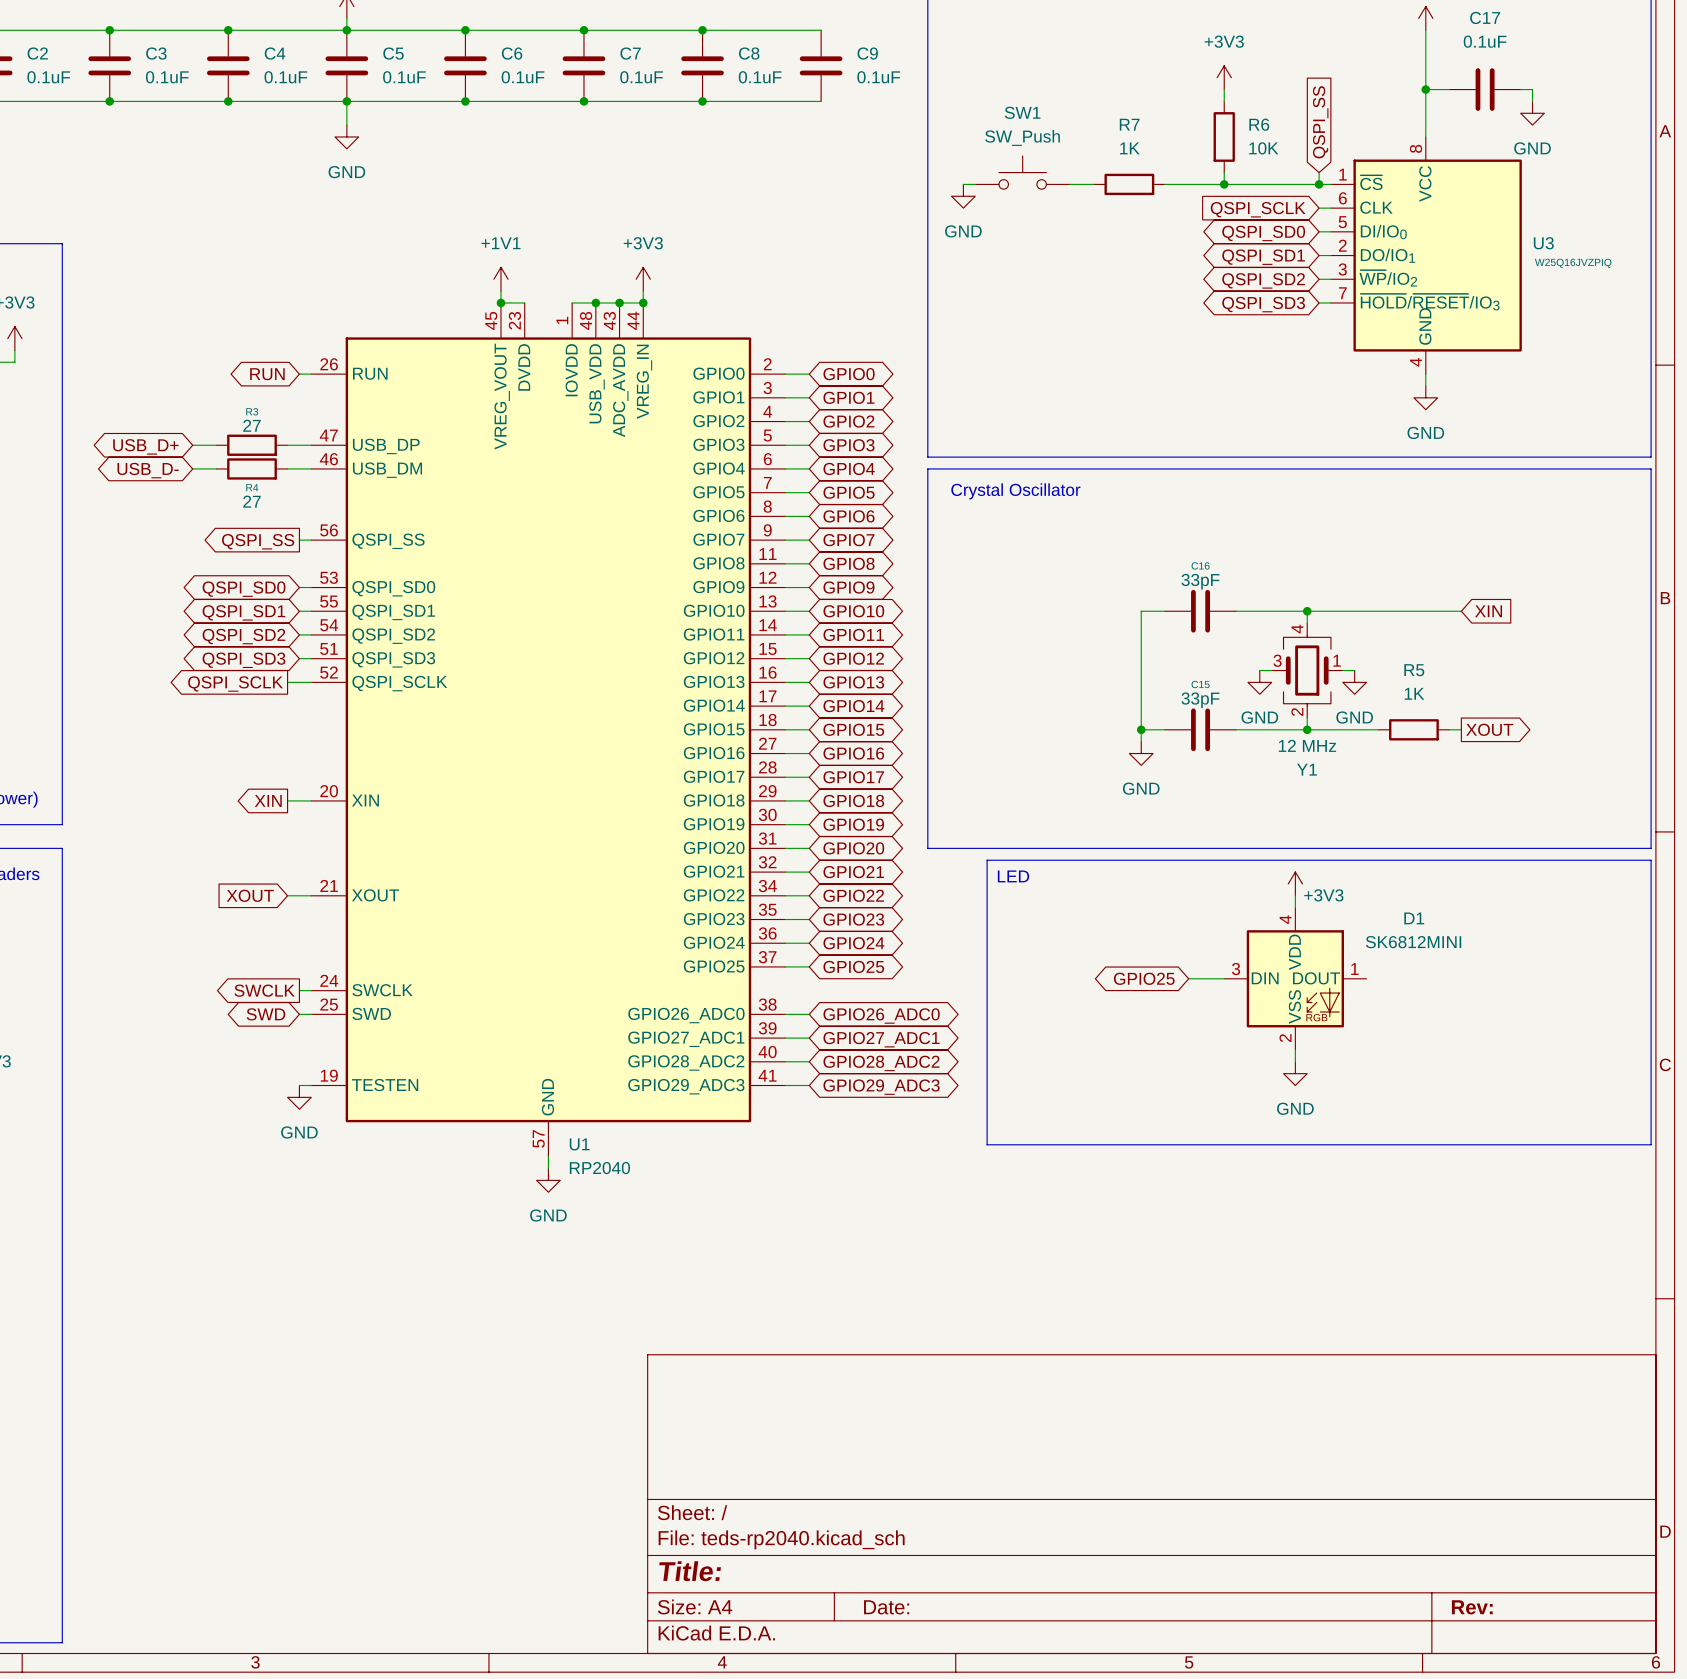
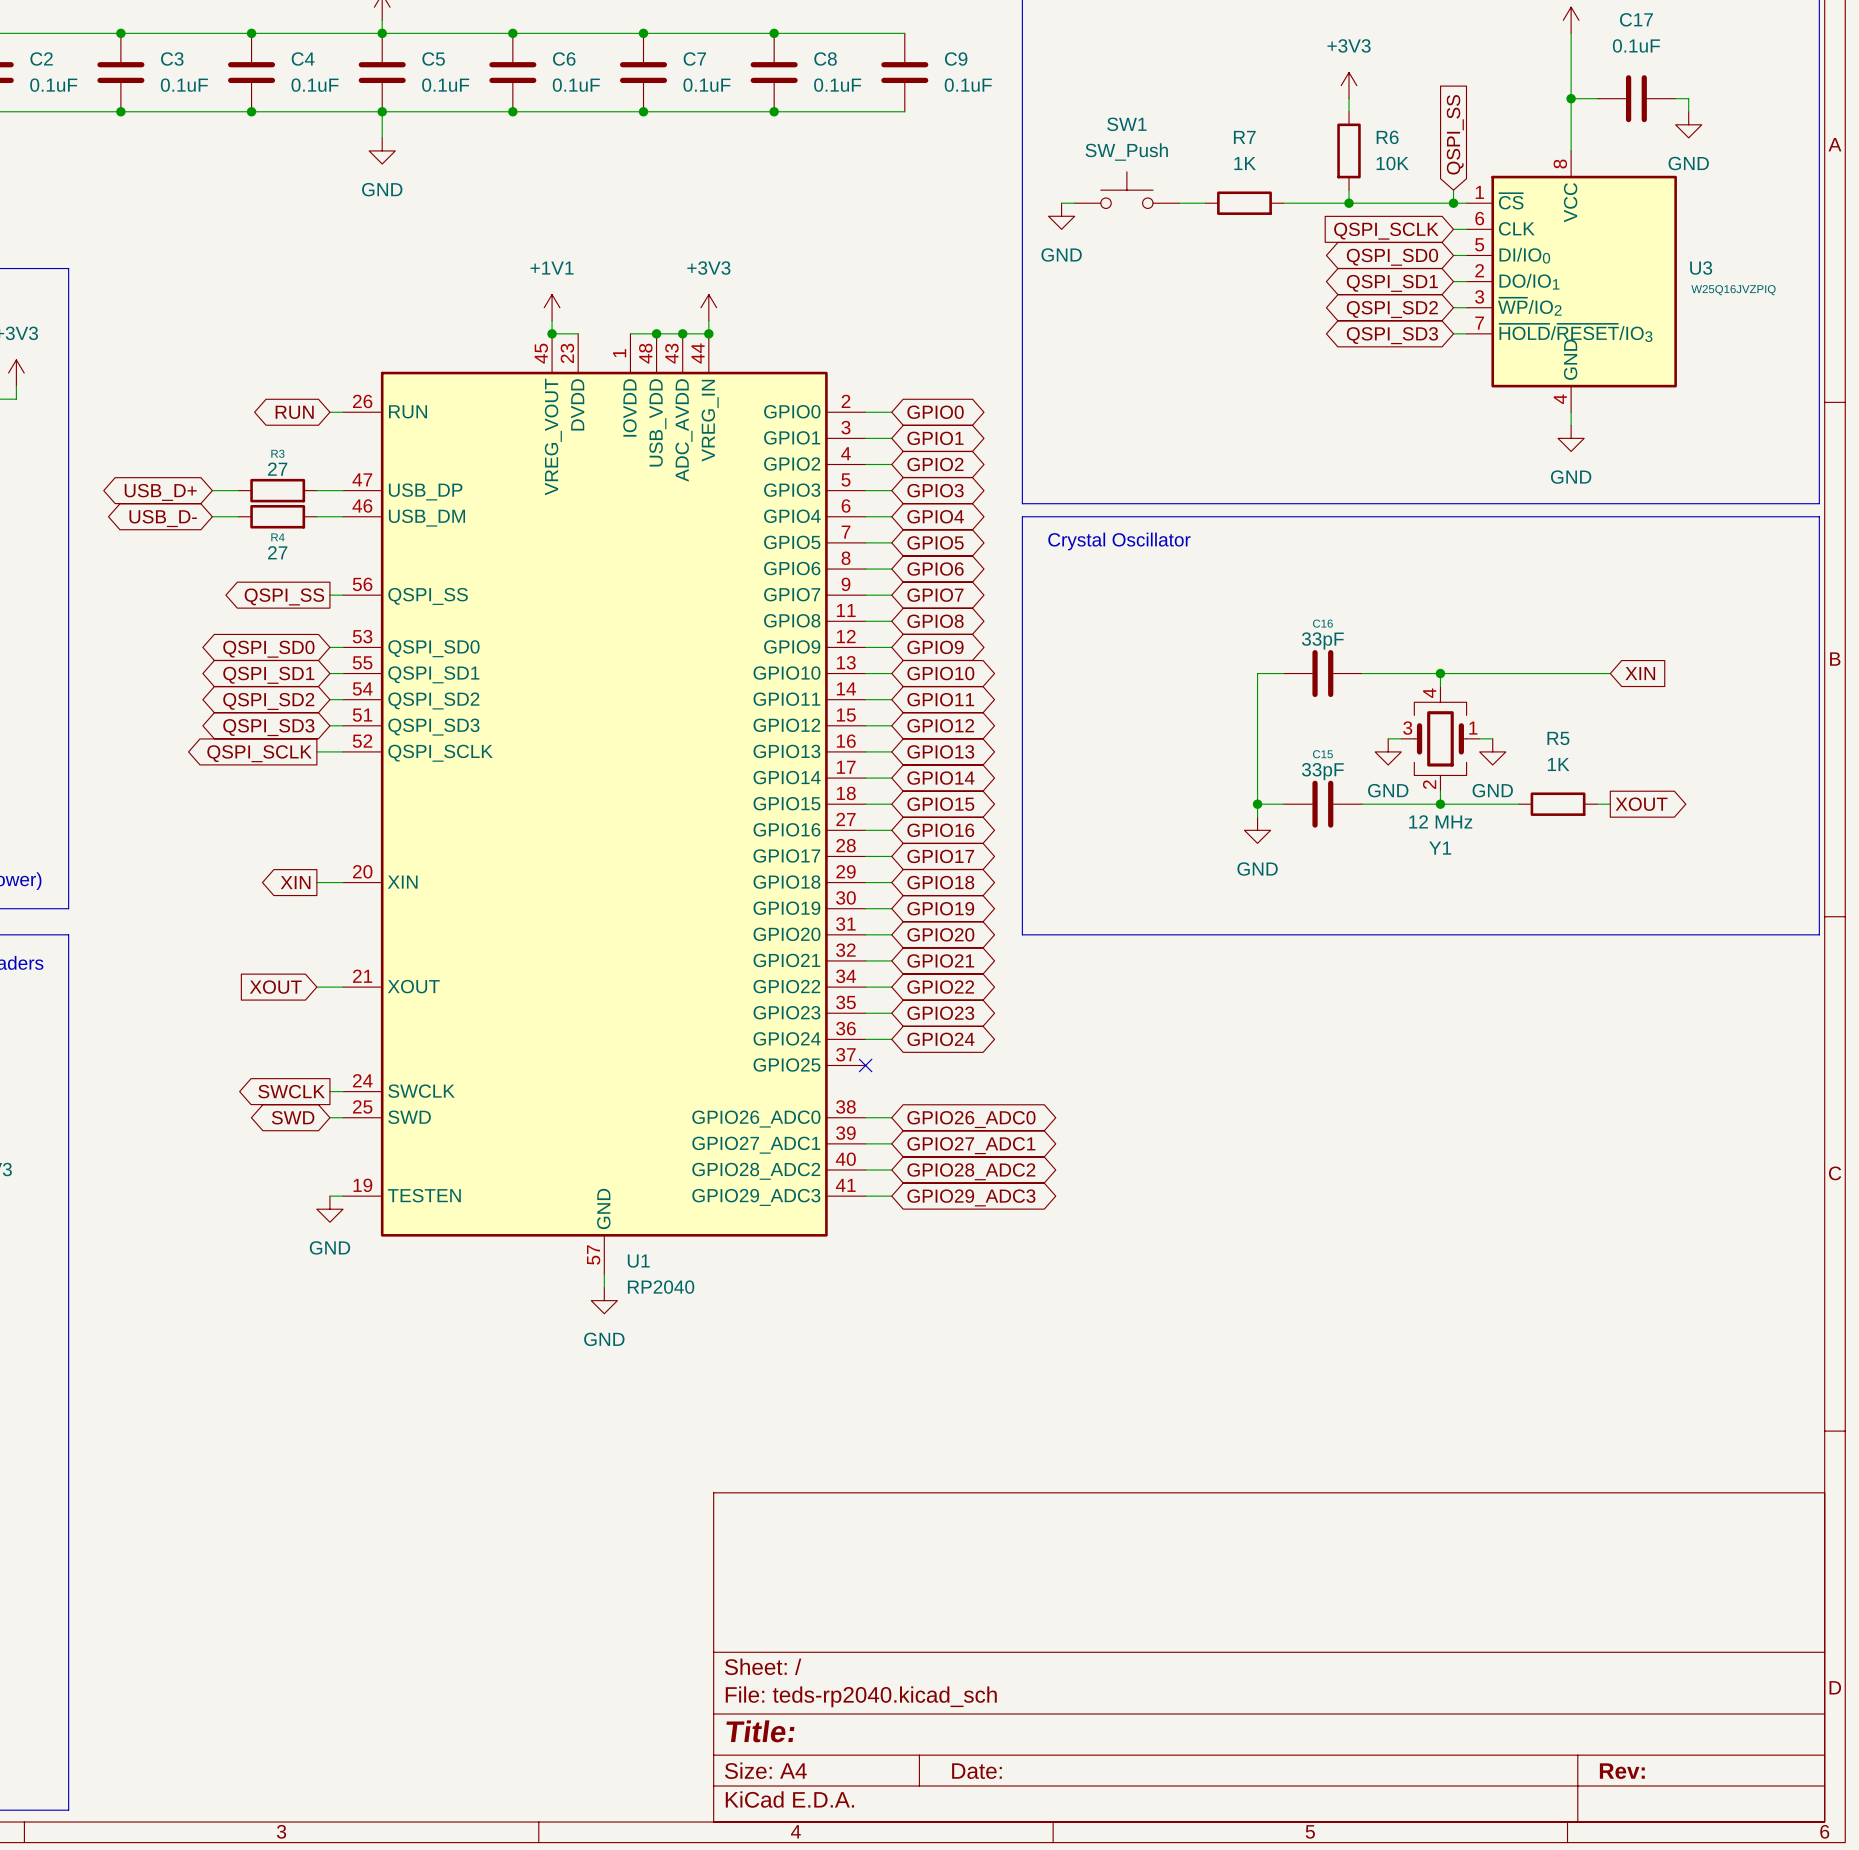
line: (987, 860) (1651, 860) (1651, 1144) (987, 1144) (987, 860) -> none
text: LED (1013, 876) -> none
power symbol: +3V3 (1295, 883) -> none
wire: (1295, 895) (1295, 907) -> none
wire: (785, 966) (809, 966) -> none
no-connect mark: none -> (865, 1065)
global label: GPIO25 (853, 966) -> none
global label: GPIO25 (1144, 978) -> none
wire: (1188, 978) (1224, 978) -> none
D1: SK6812MINI (1295, 978) -> none
wire: (1295, 1049) (1295, 1061) -> none
power symbol: GND (1295, 1073) -> none

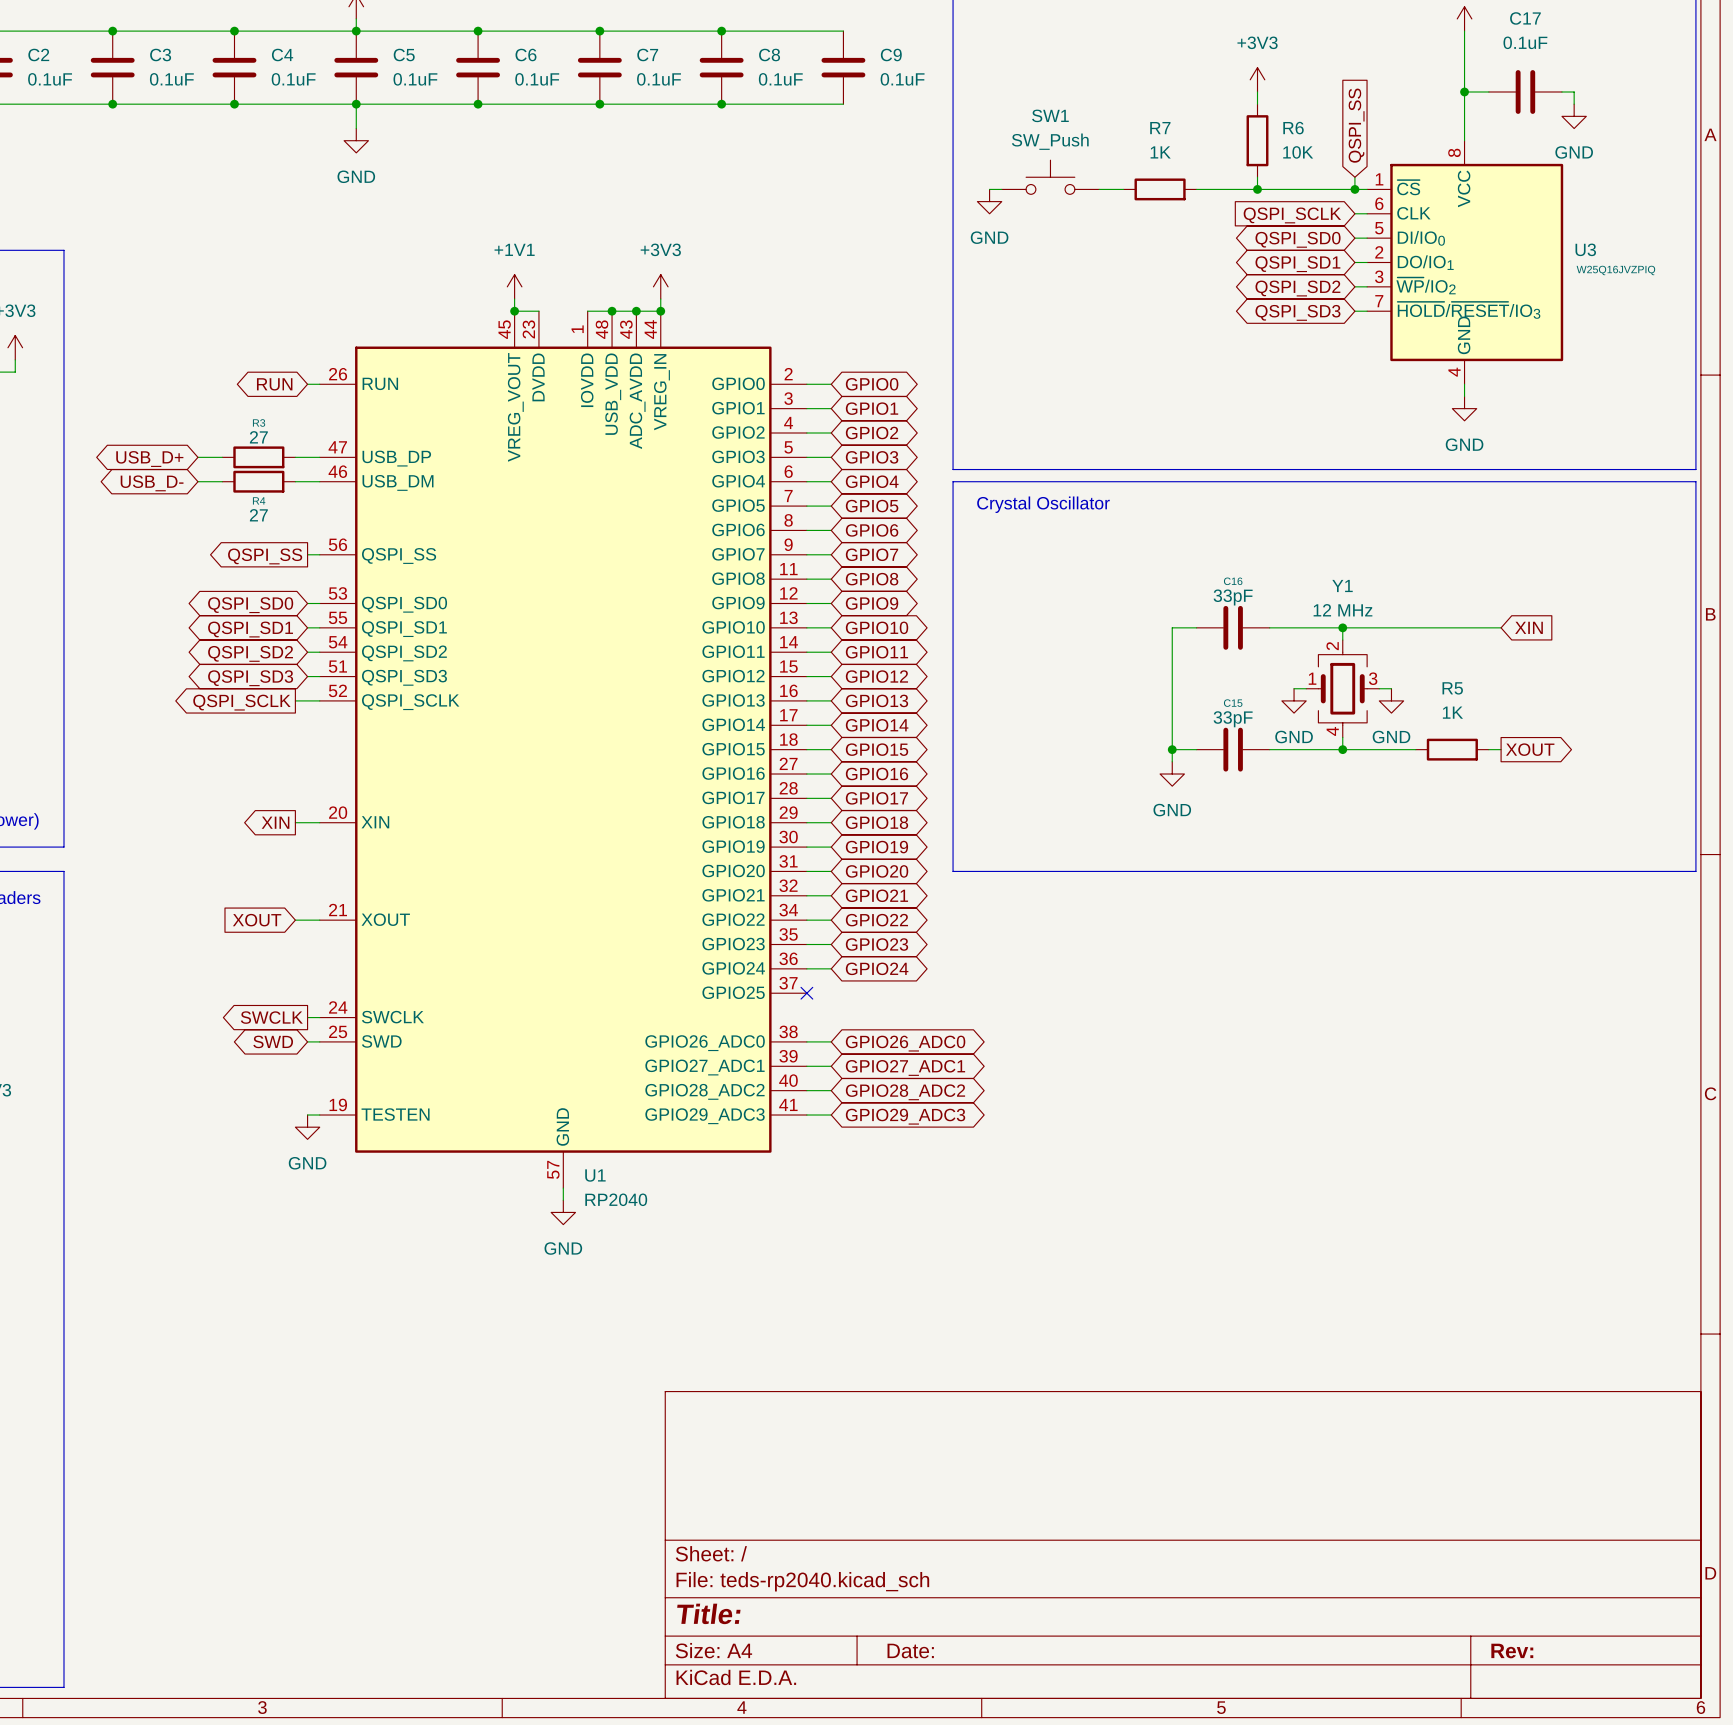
Y1 rotation: 0° (1440, 738) -> 180° (1342, 688)

